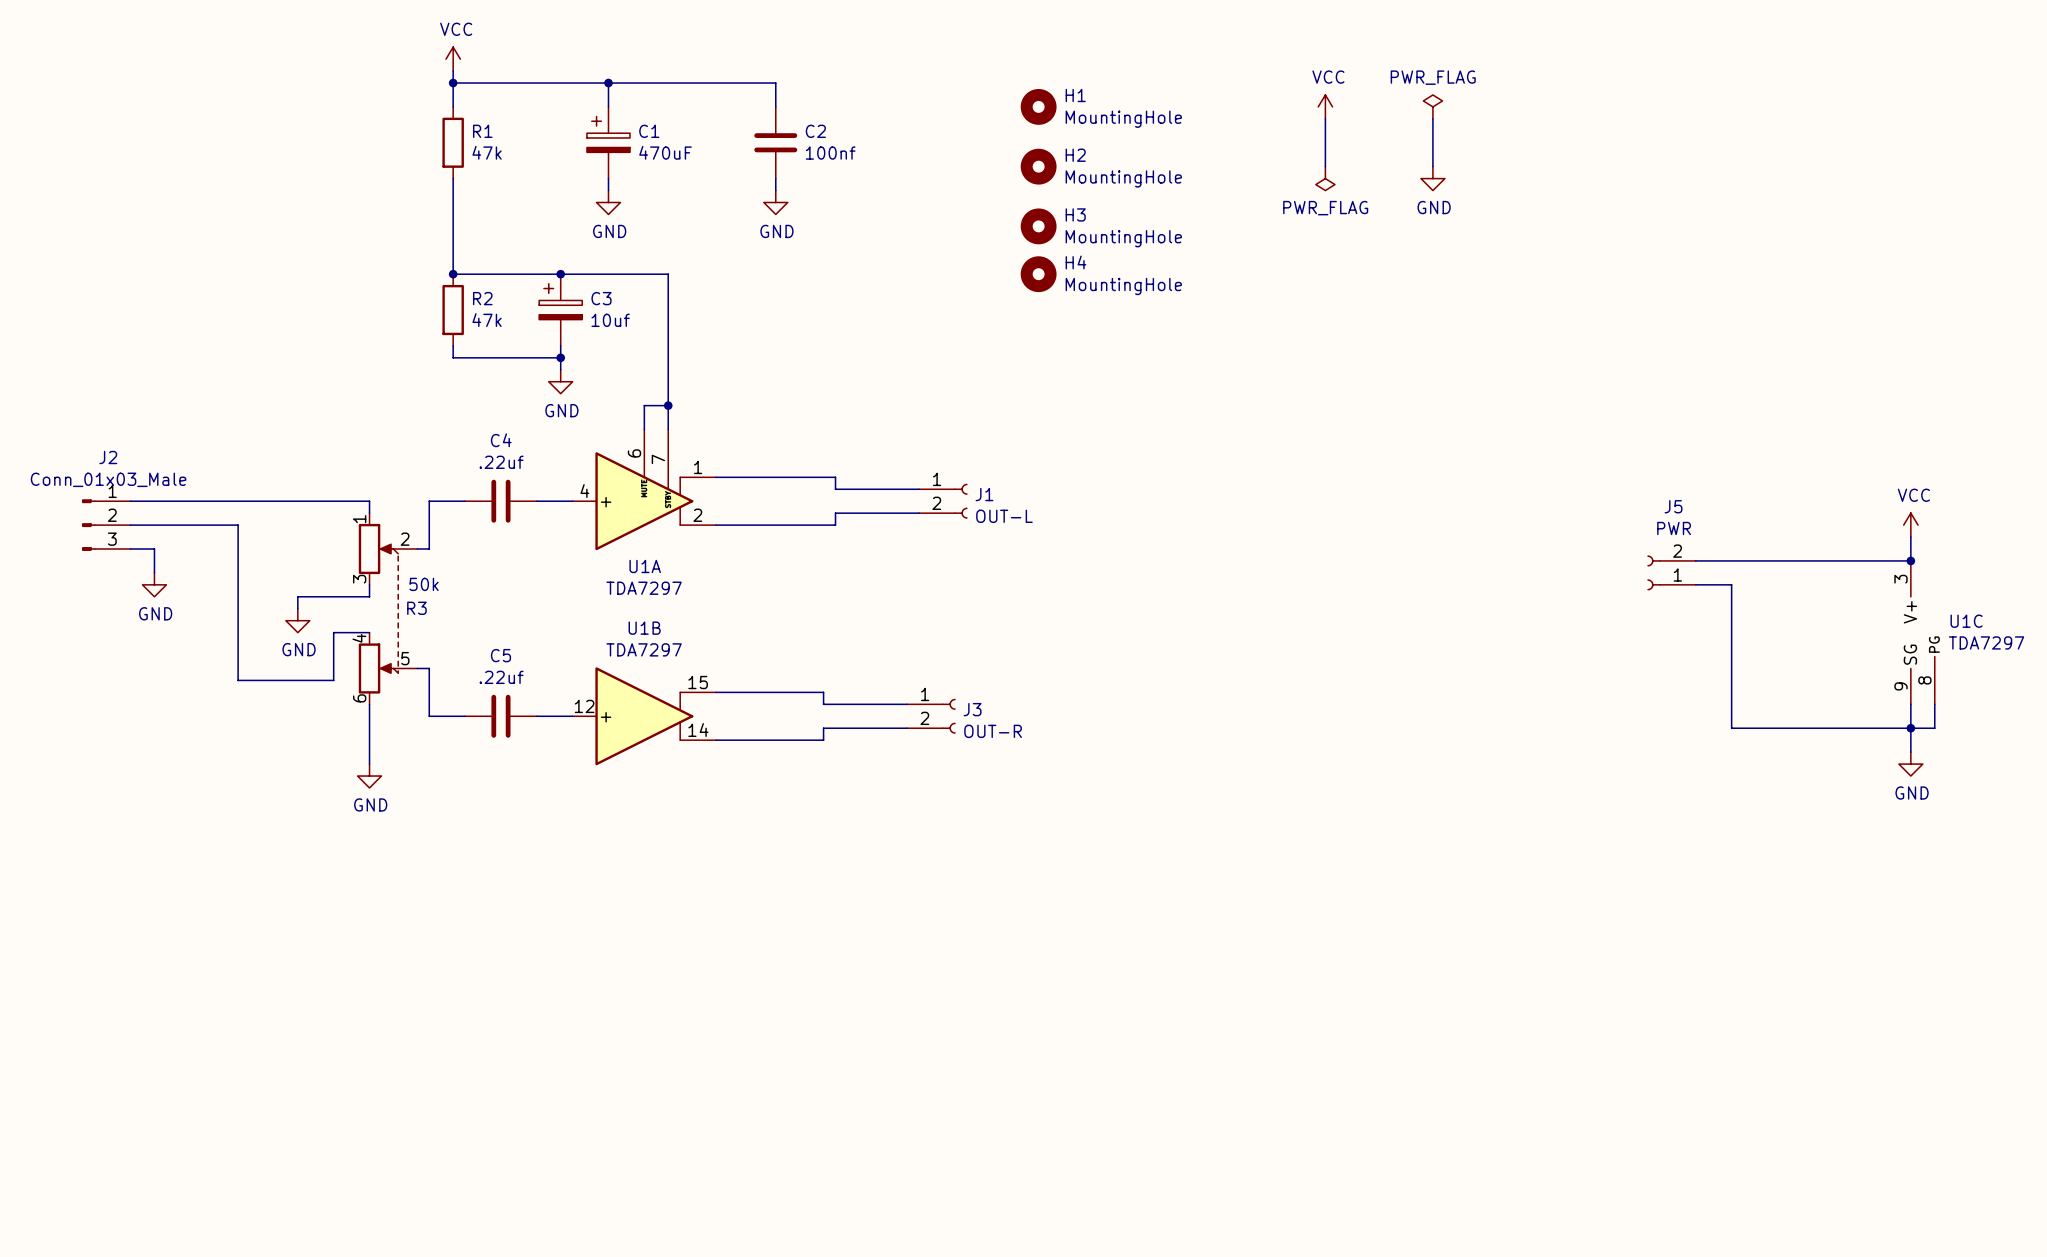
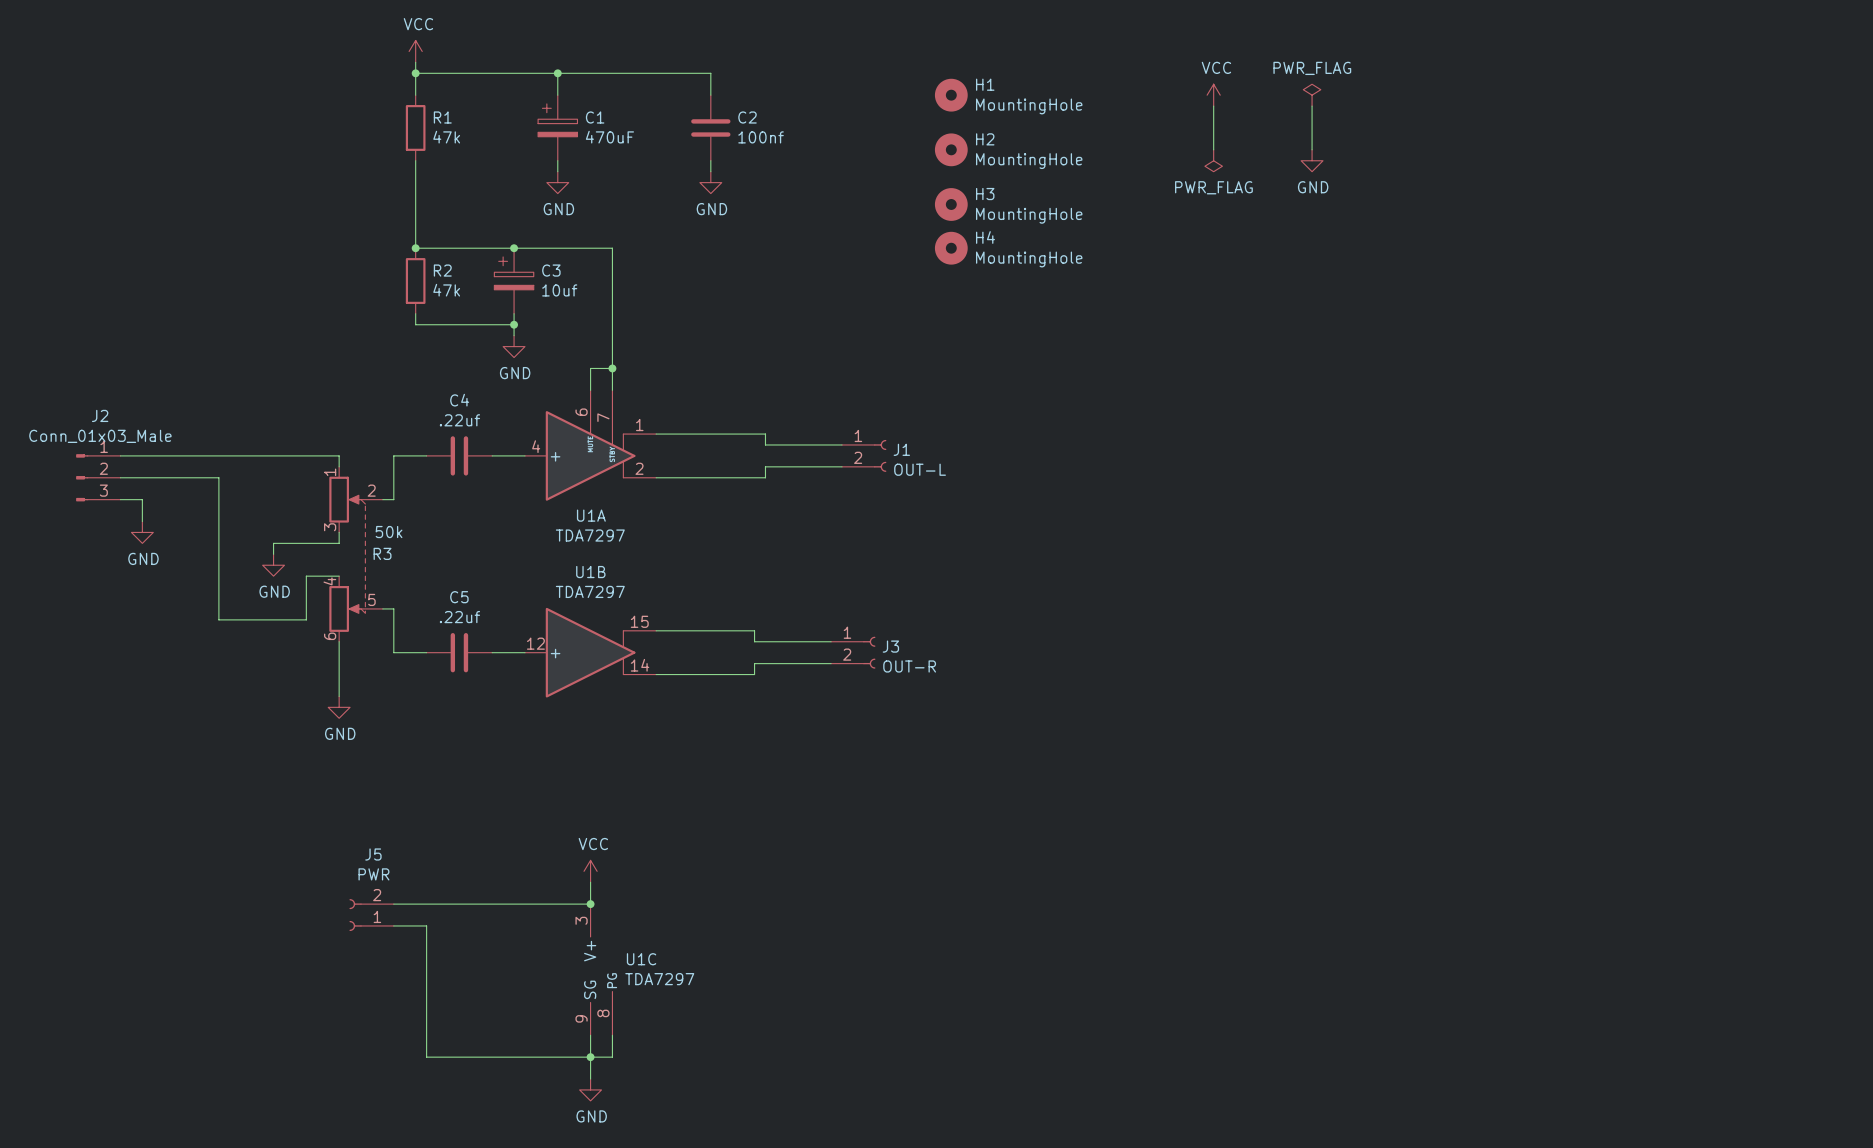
power symbol: VCC (1910, 525) -> none
wire: (1910, 537) (1910, 560) (1695, 560) -> none
junction: (1910, 560) -> none
J5 position: (1671, 572) -> (371, 915)
wire: (1695, 584) (1731, 584) (1731, 728) (1934, 728) (1934, 704) -> none
U1C position: (1922, 632) -> (601, 969)
wire: (1910, 704) (1910, 752) -> none
junction: (1910, 728) -> none
power symbol: GND (1910, 764) -> none
power symbol: none -> VCC (590, 871)
wire: none -> (590, 882) (590, 904) (393, 904)
junction: none -> (590, 904)
wire: none -> (393, 925) (426, 925) (426, 1057) (612, 1057) (612, 1035)
wire: none -> (590, 1035) (590, 1079)
junction: none -> (590, 1057)
power symbol: none -> GND (590, 1089)

